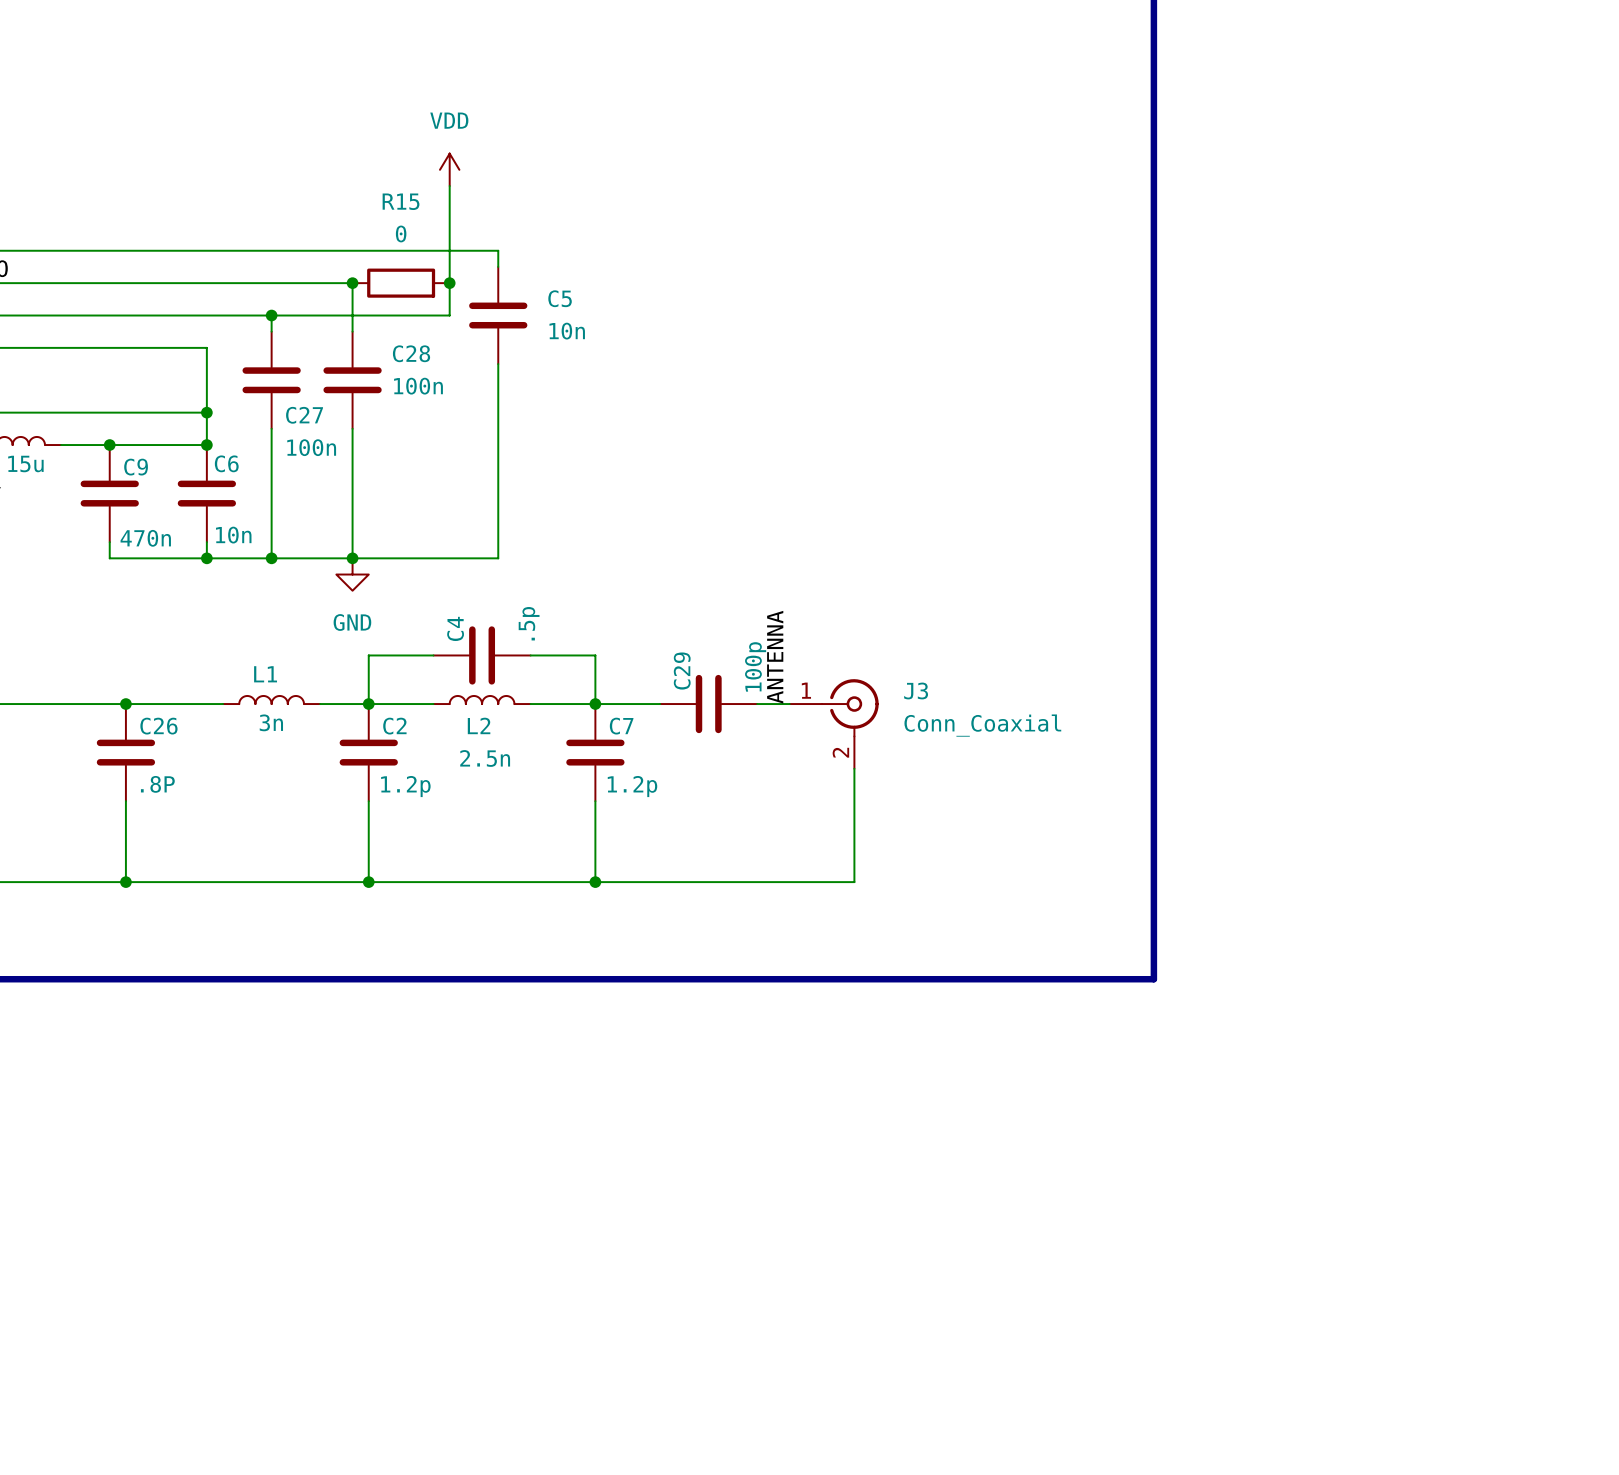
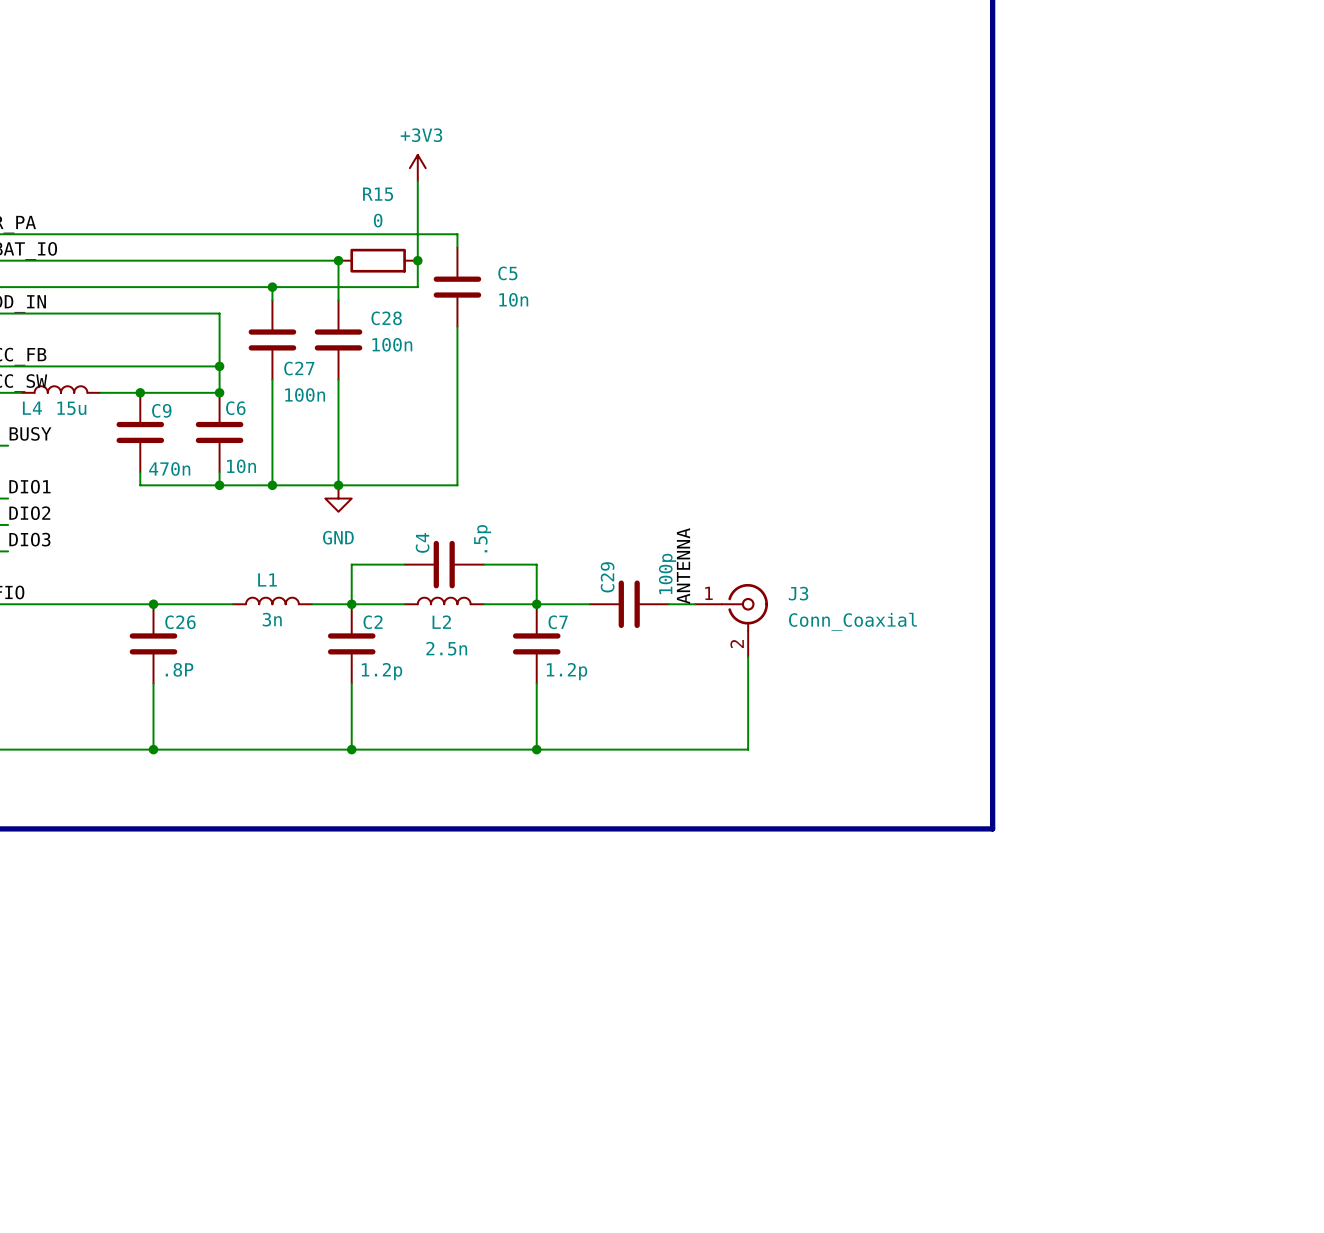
power symbol: VDD (449, 169) -> +3V3 (417, 168)

